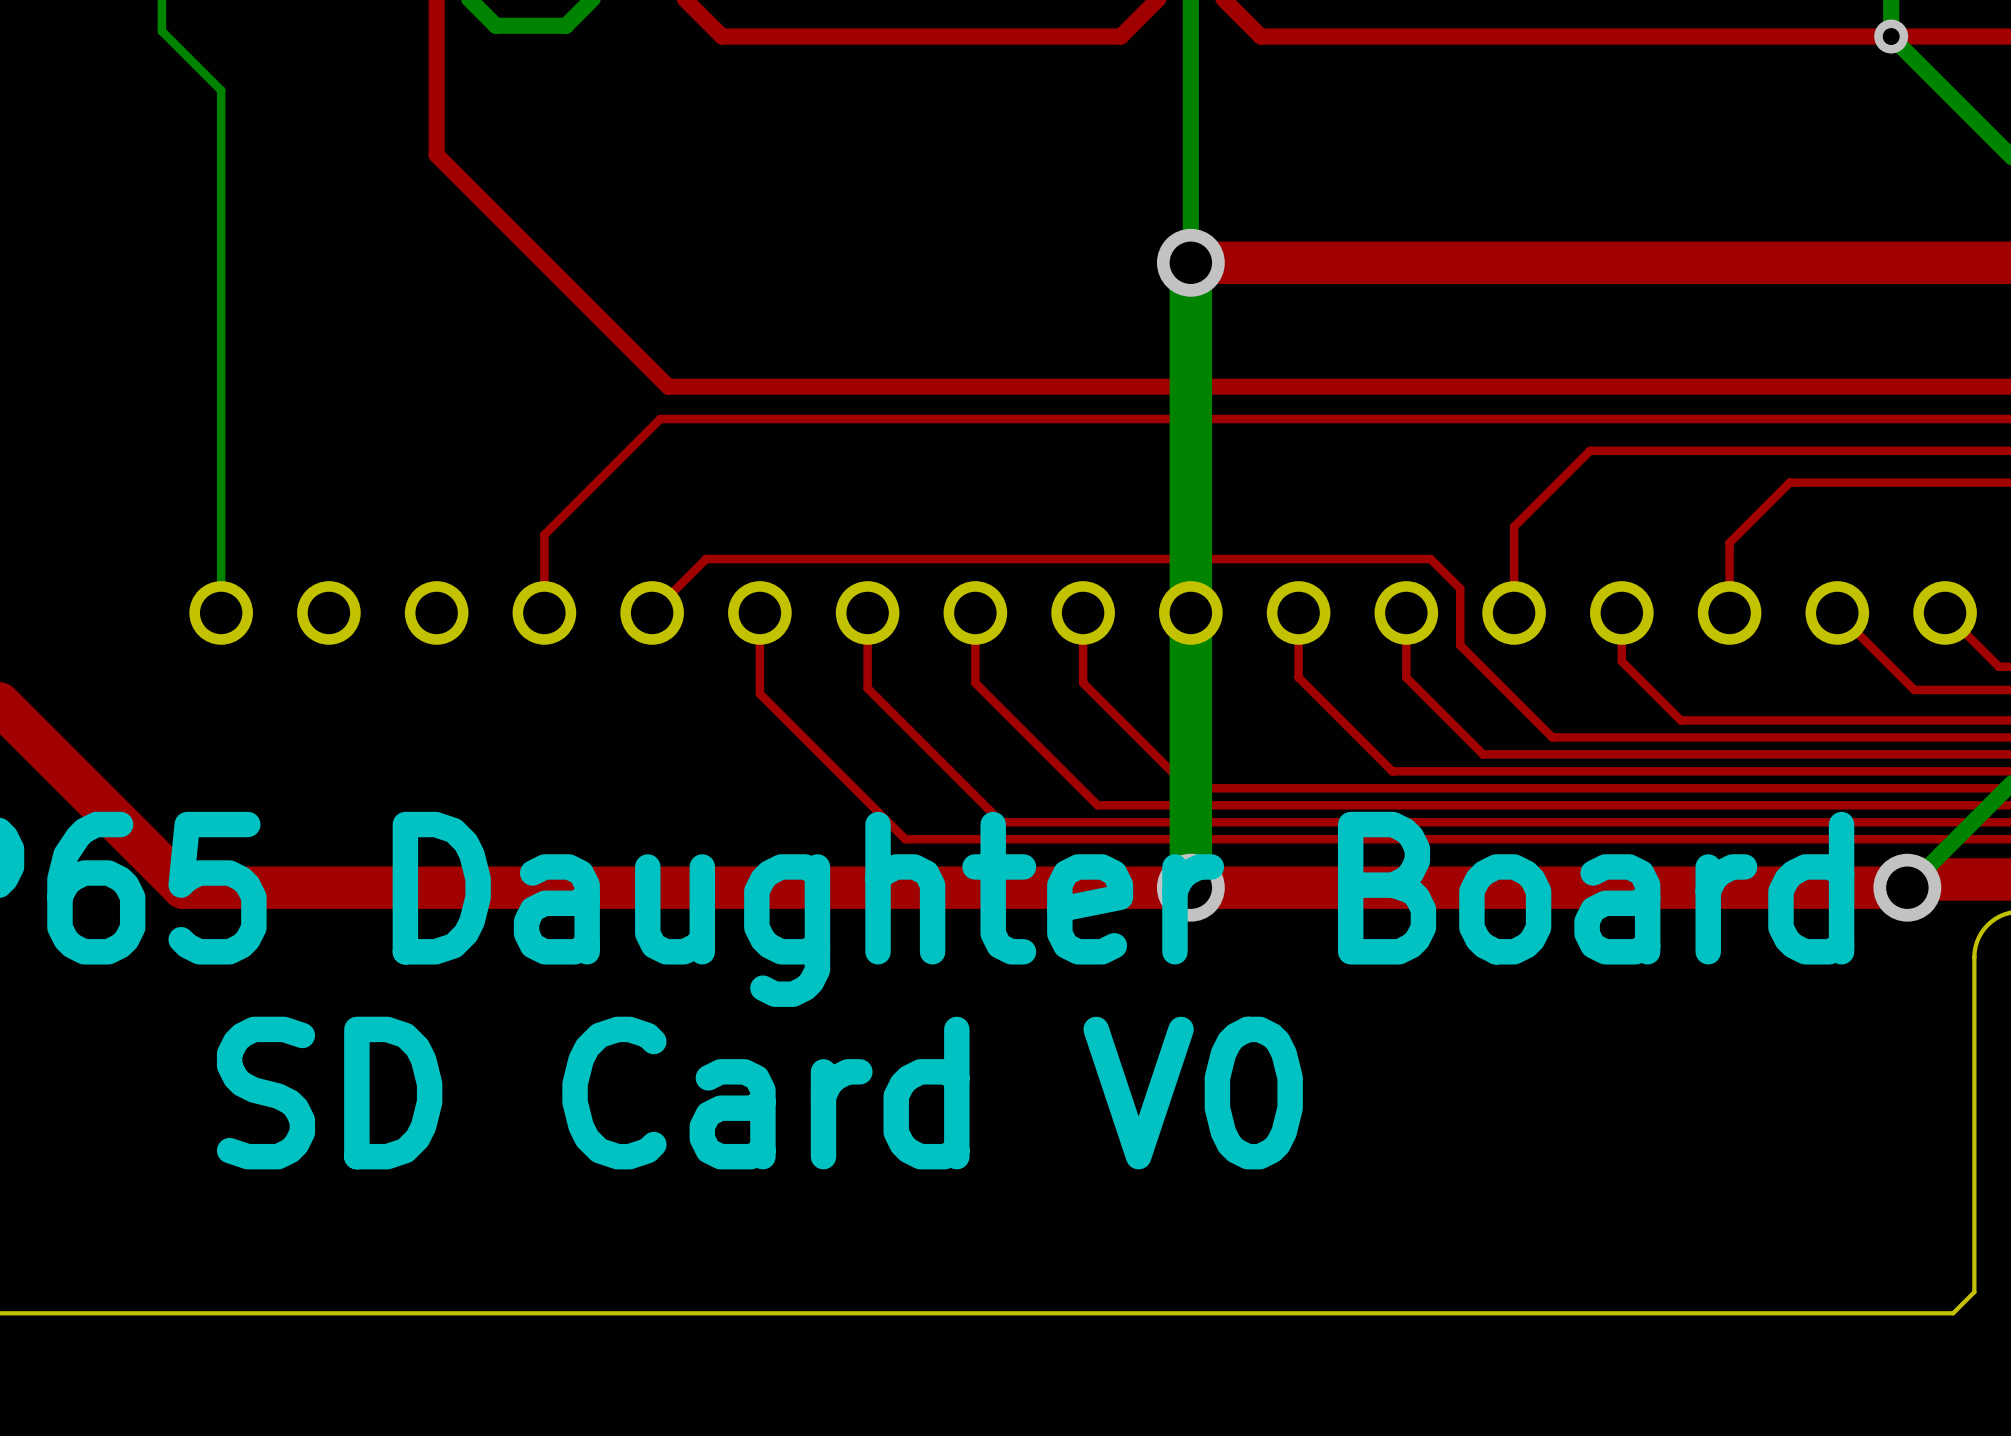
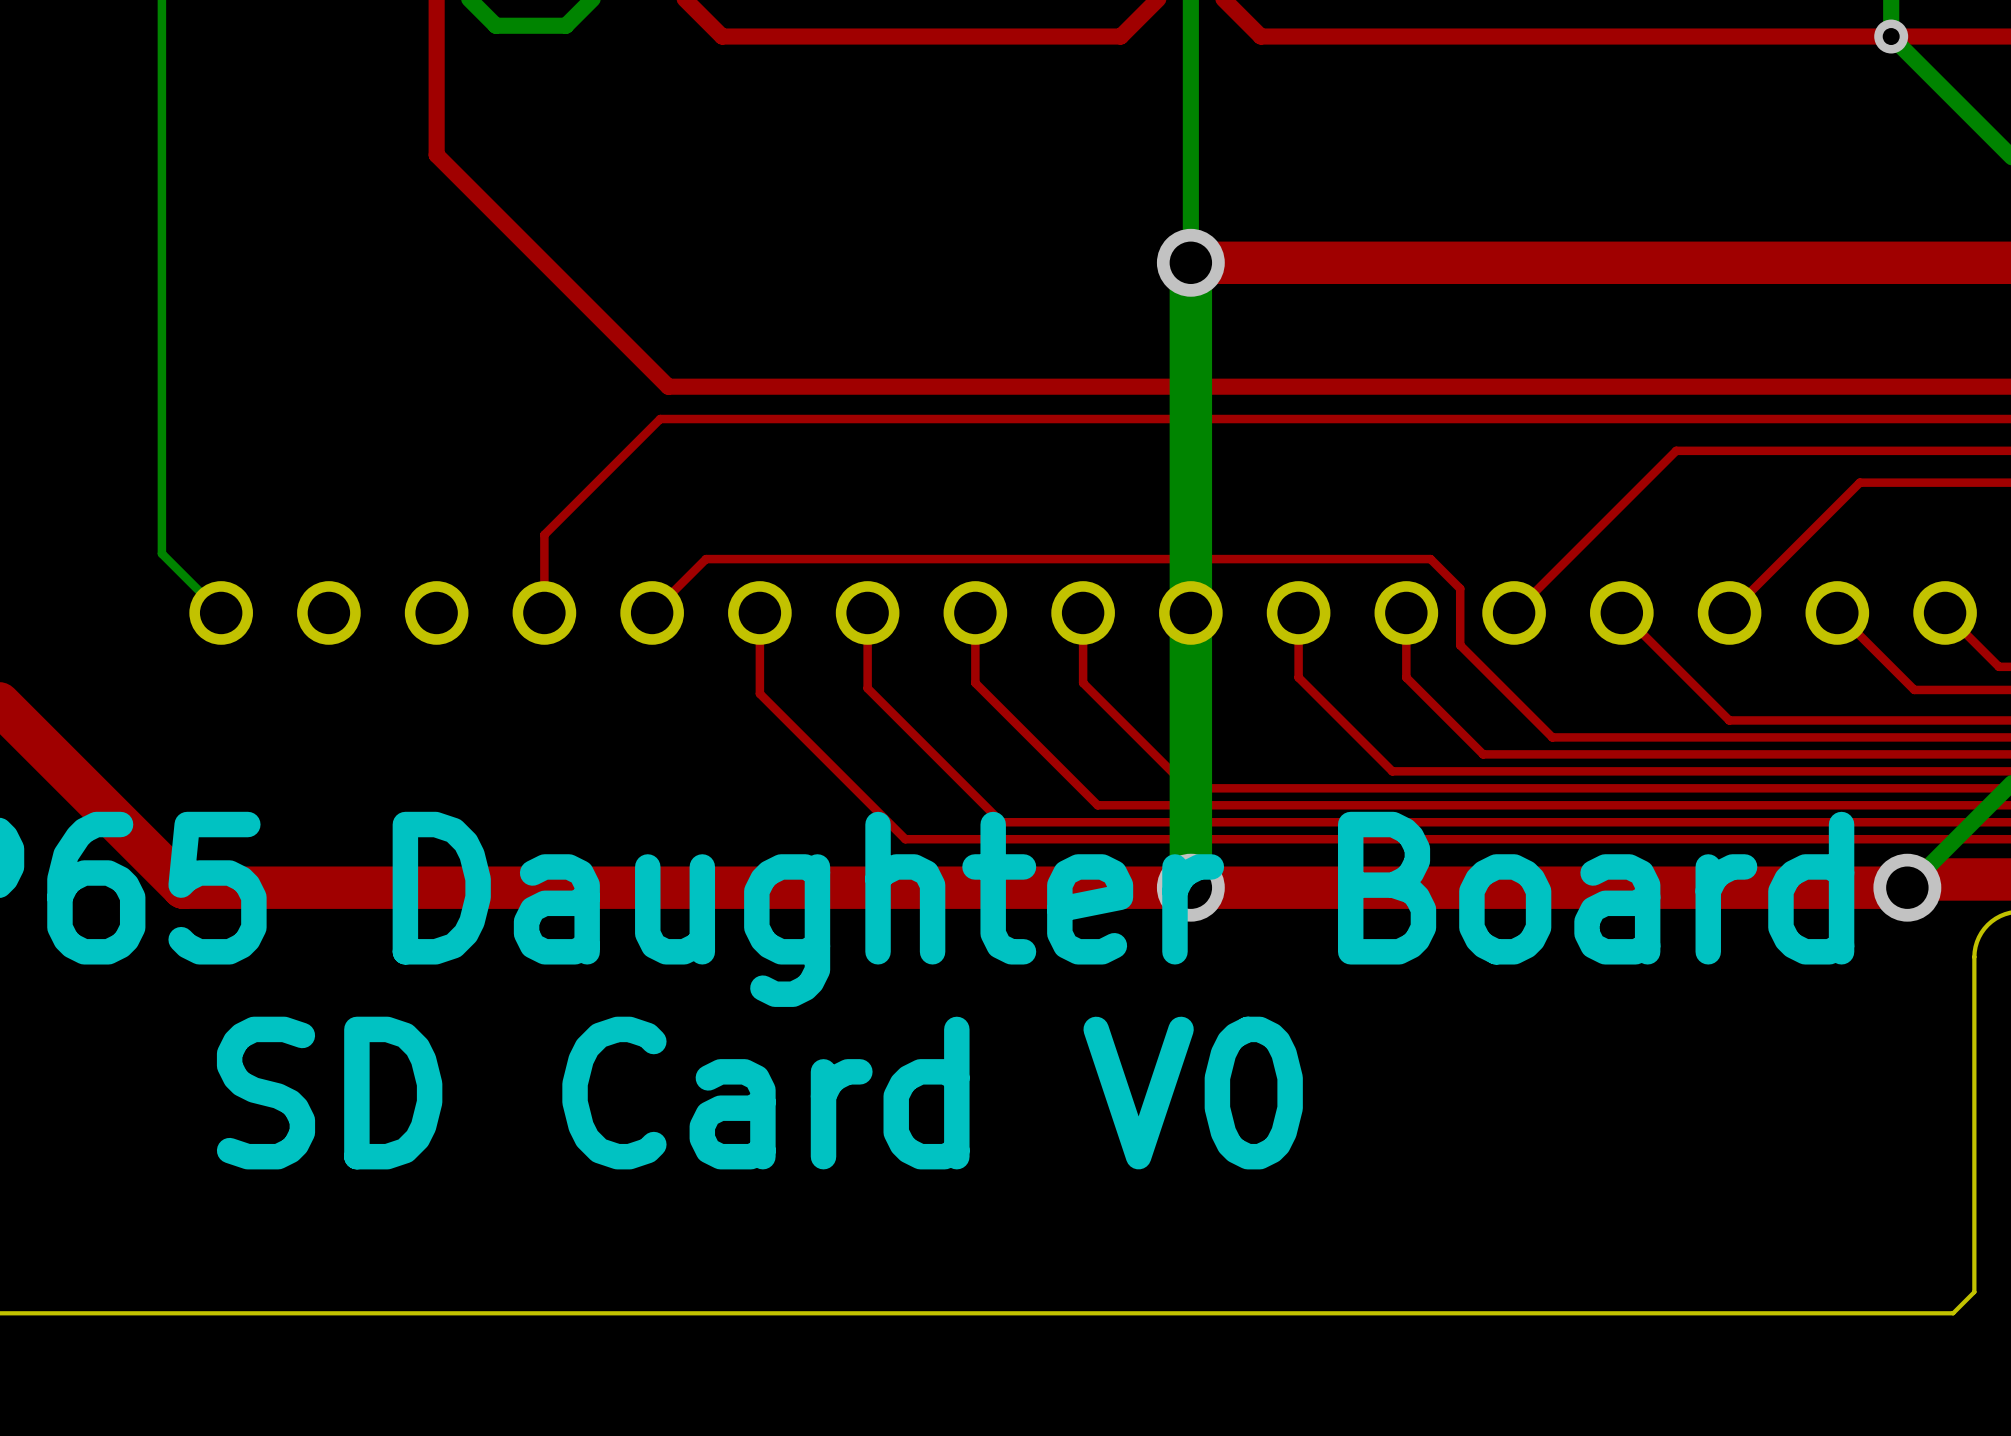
bottom track: (161, 31) (221, 90) (221, 612) -> (161, 31) (161, 553) (221, 612)
top track: (1676, 450) (1590, 450) (1514, 526) (1514, 612) -> (1676, 450) (1514, 612)
top track: (1859, 482) (1789, 482) (1729, 542) (1729, 612) -> (1859, 482) (1729, 612)
top track: (1621, 612) (1621, 661) (1680, 720) (1729, 720) -> (1621, 612) (1729, 720)

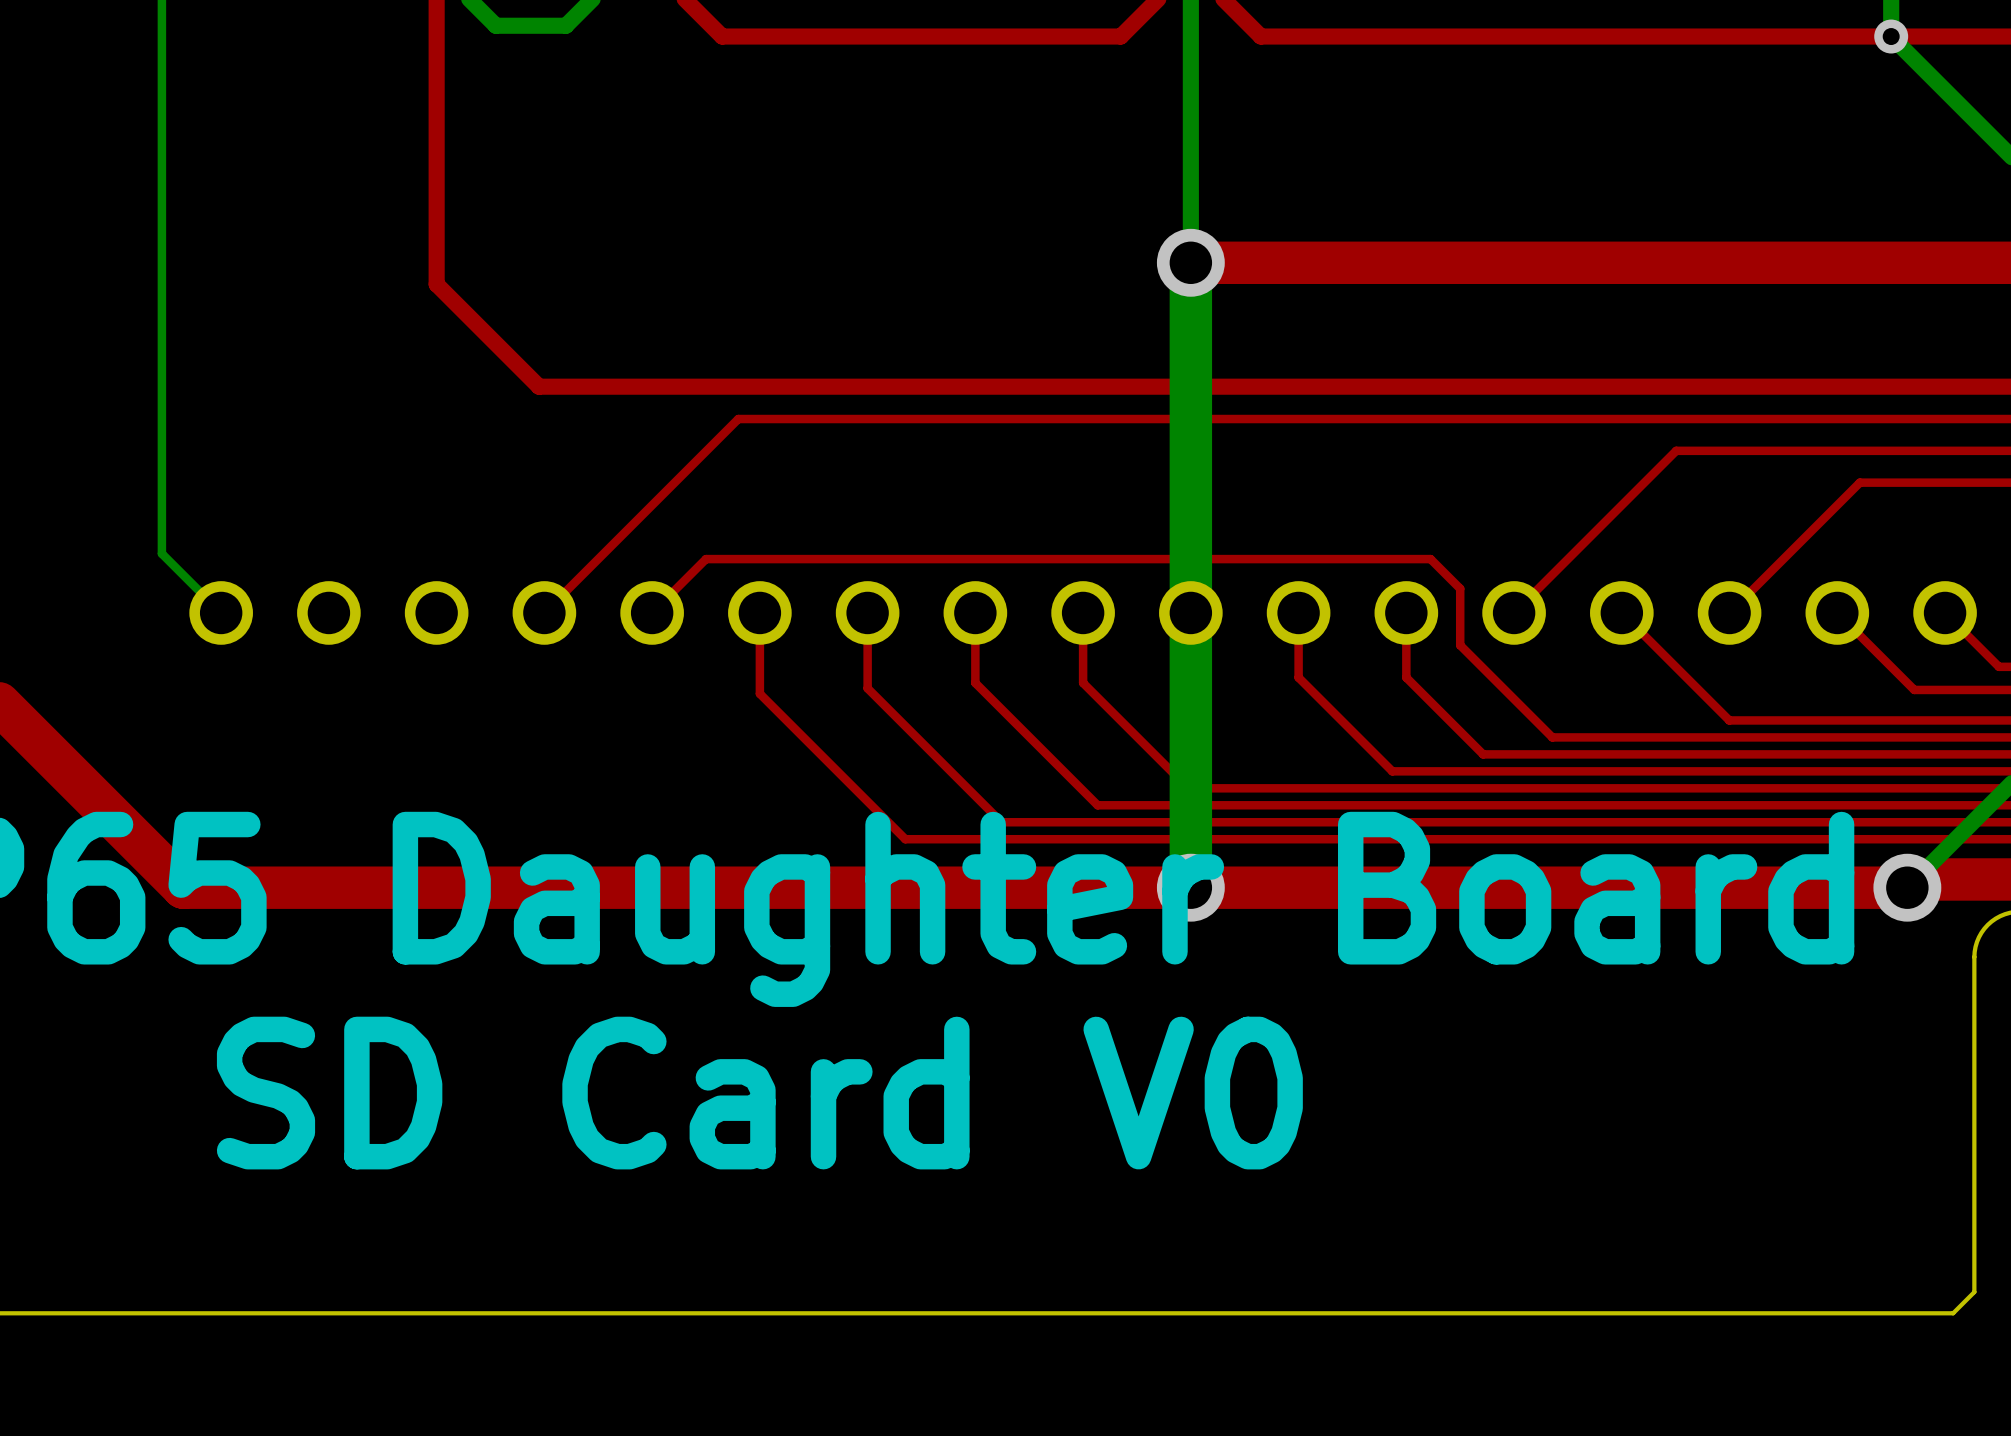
top track: (436, 155) (668, 386) -> (436, 155) (436, 284) (539, 386) (668, 386)
top track: (738, 419) (660, 419) (544, 534) (544, 612) -> (738, 419) (544, 612)

